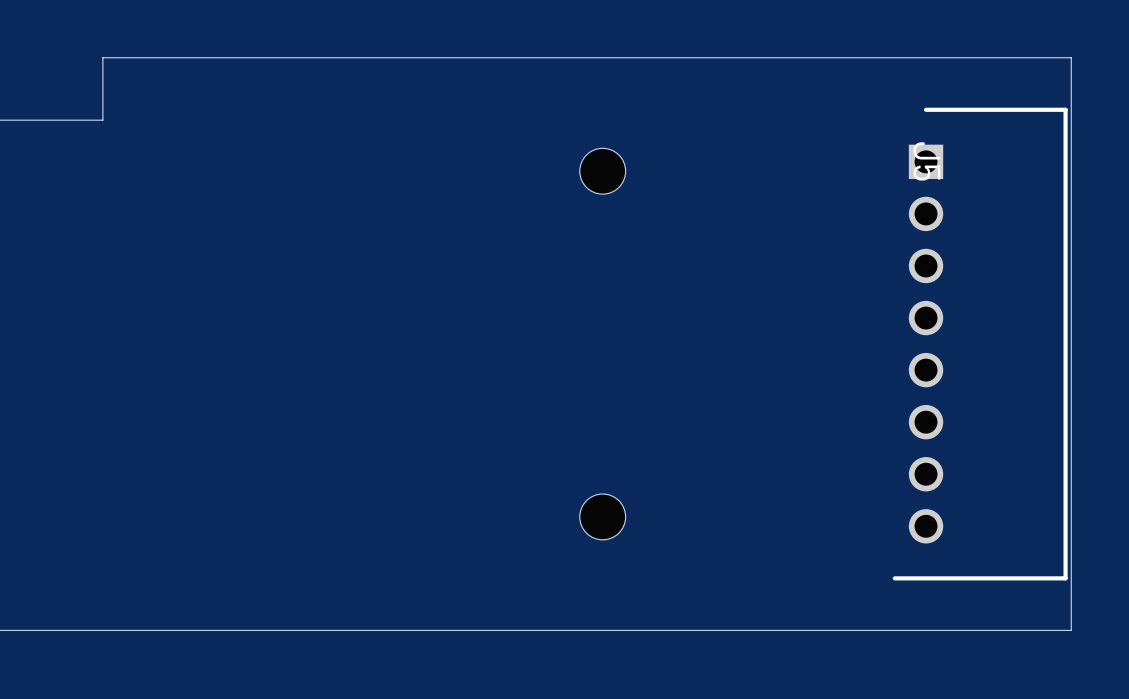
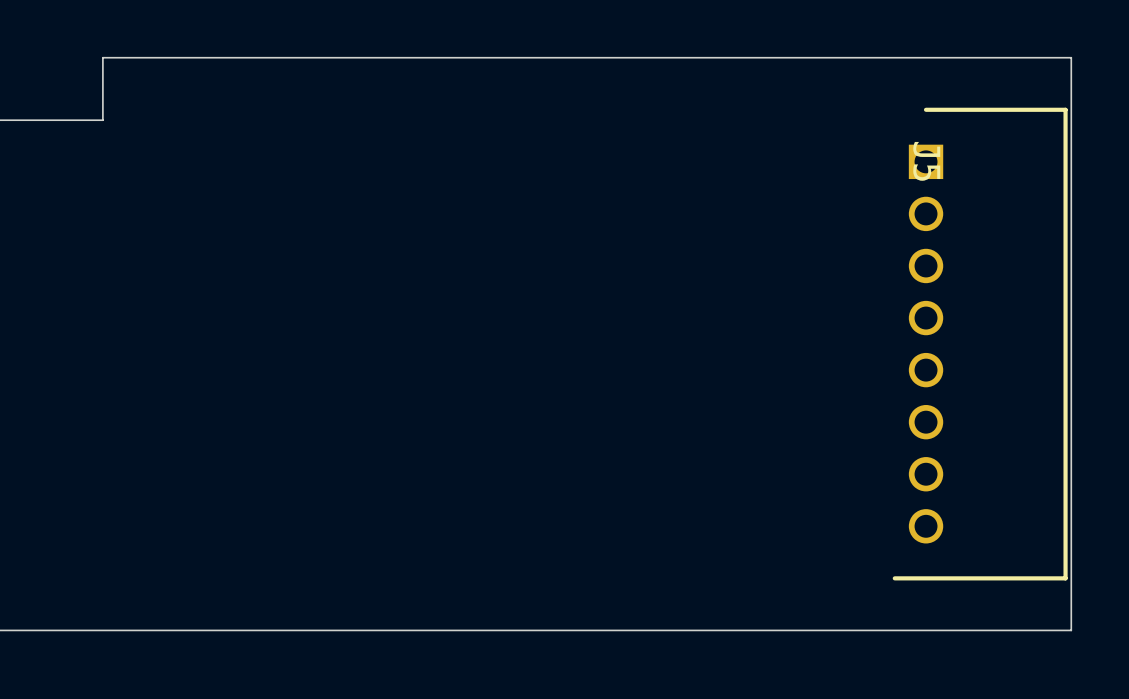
part: (602, 171) -> none
part: (602, 516) -> none

